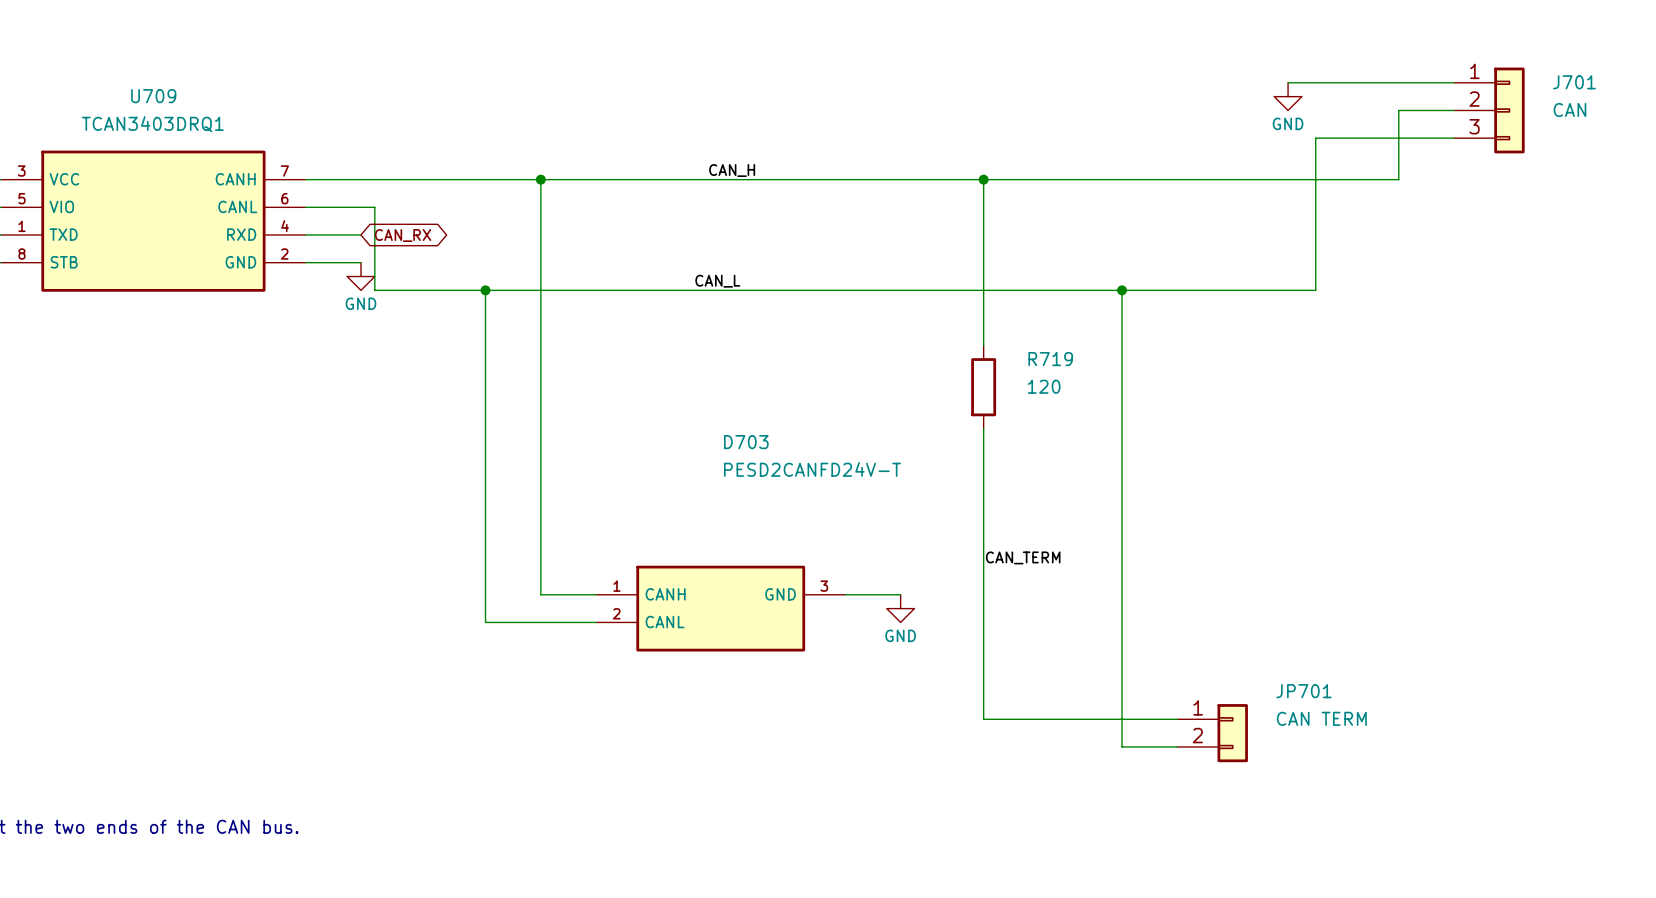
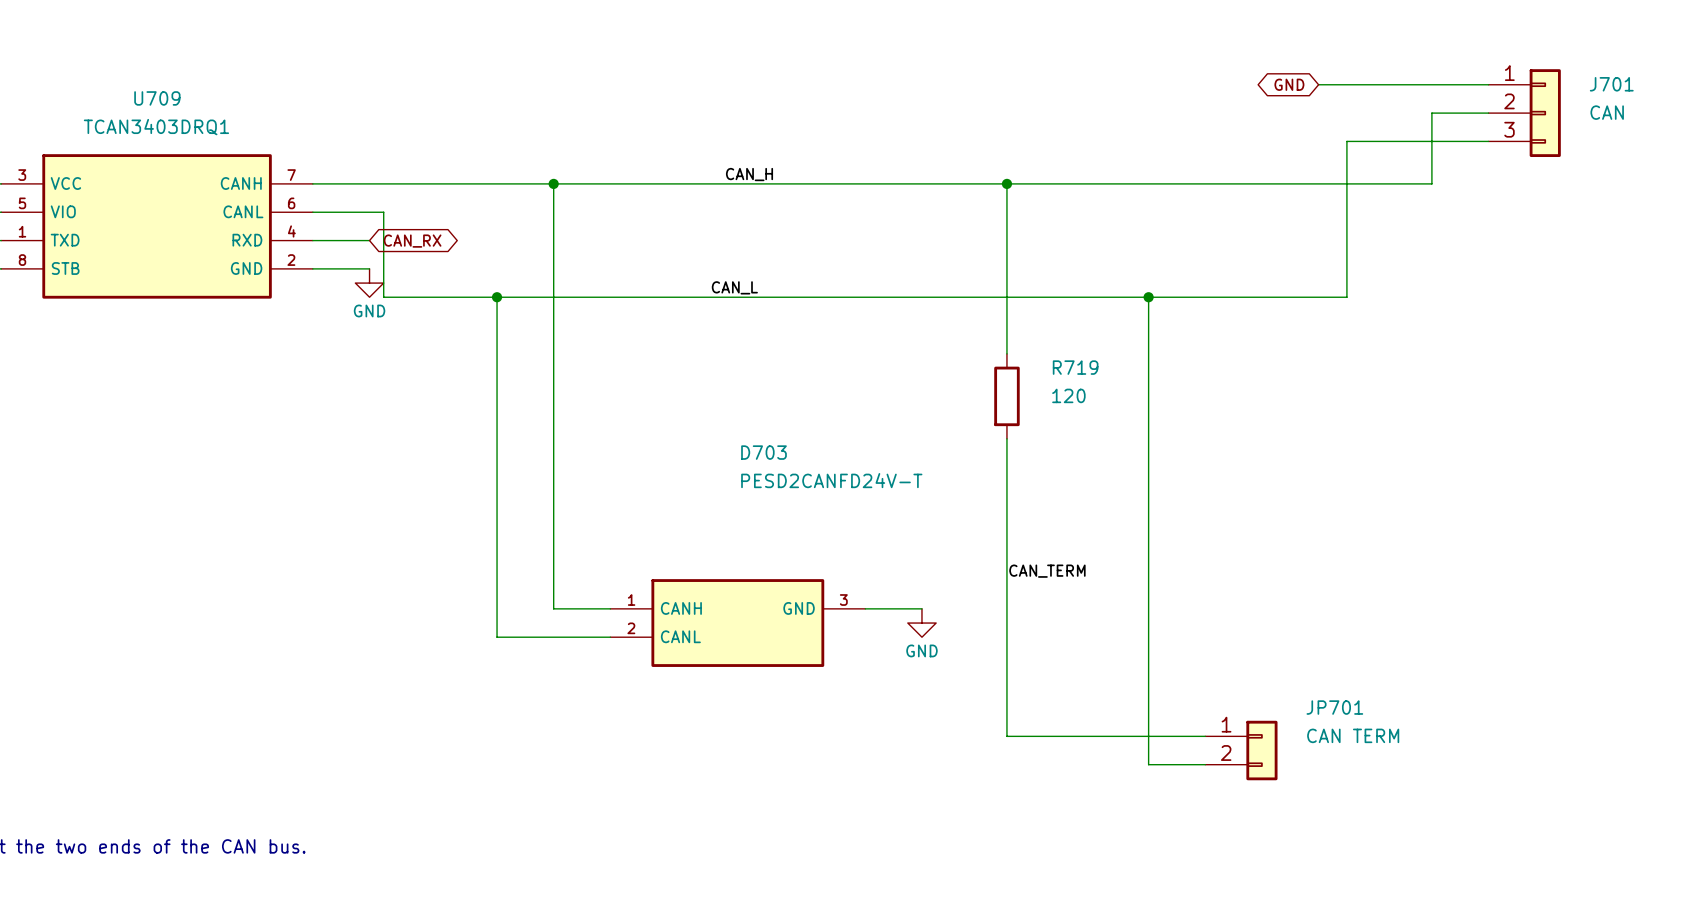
global label: none -> GND (1289, 84)
power symbol: GND (1288, 96) -> none

